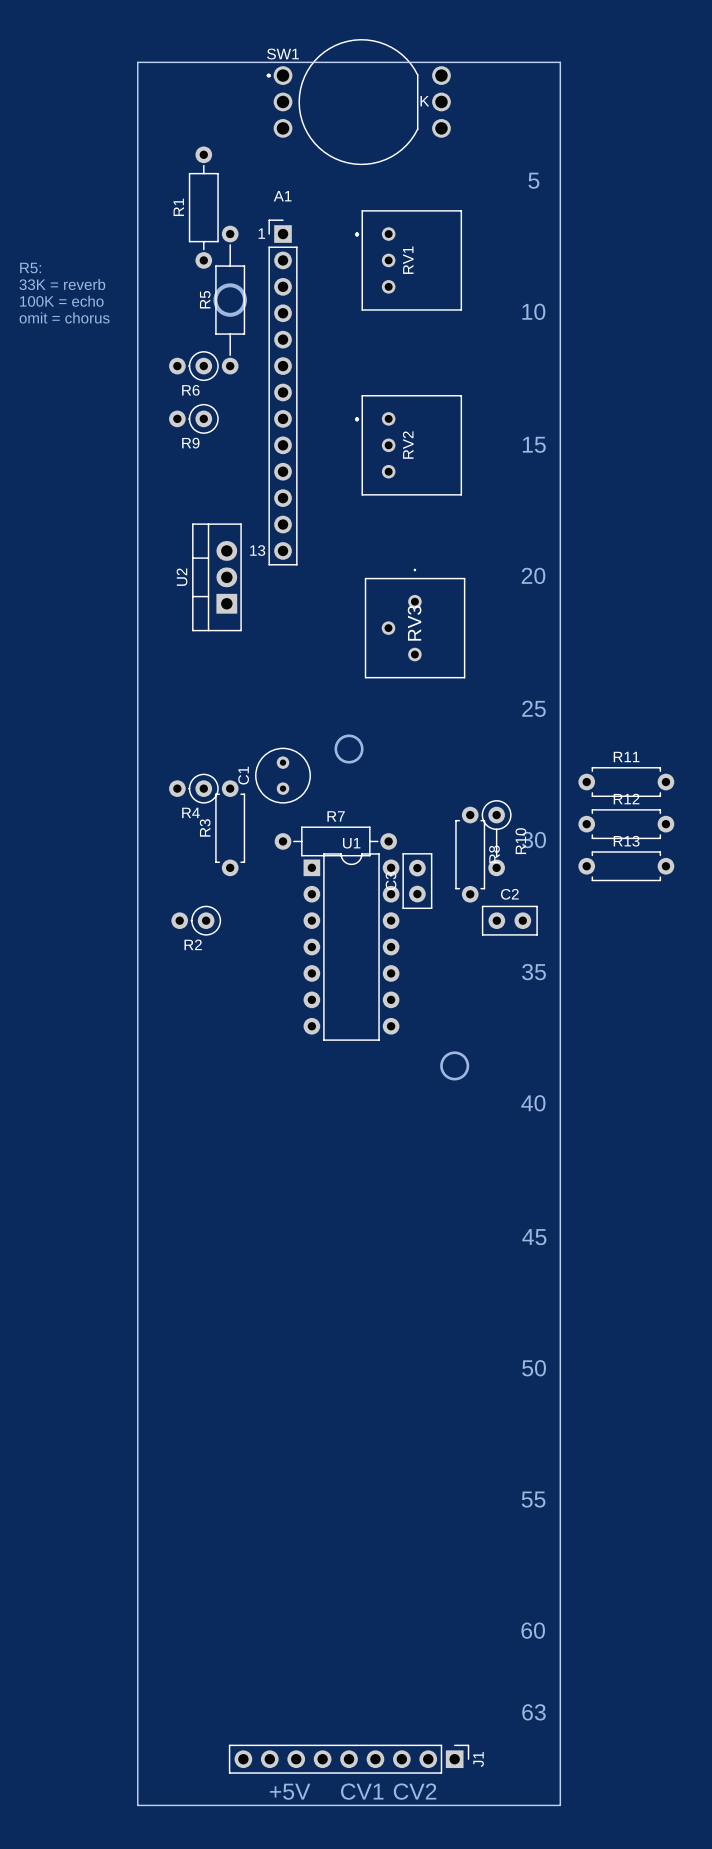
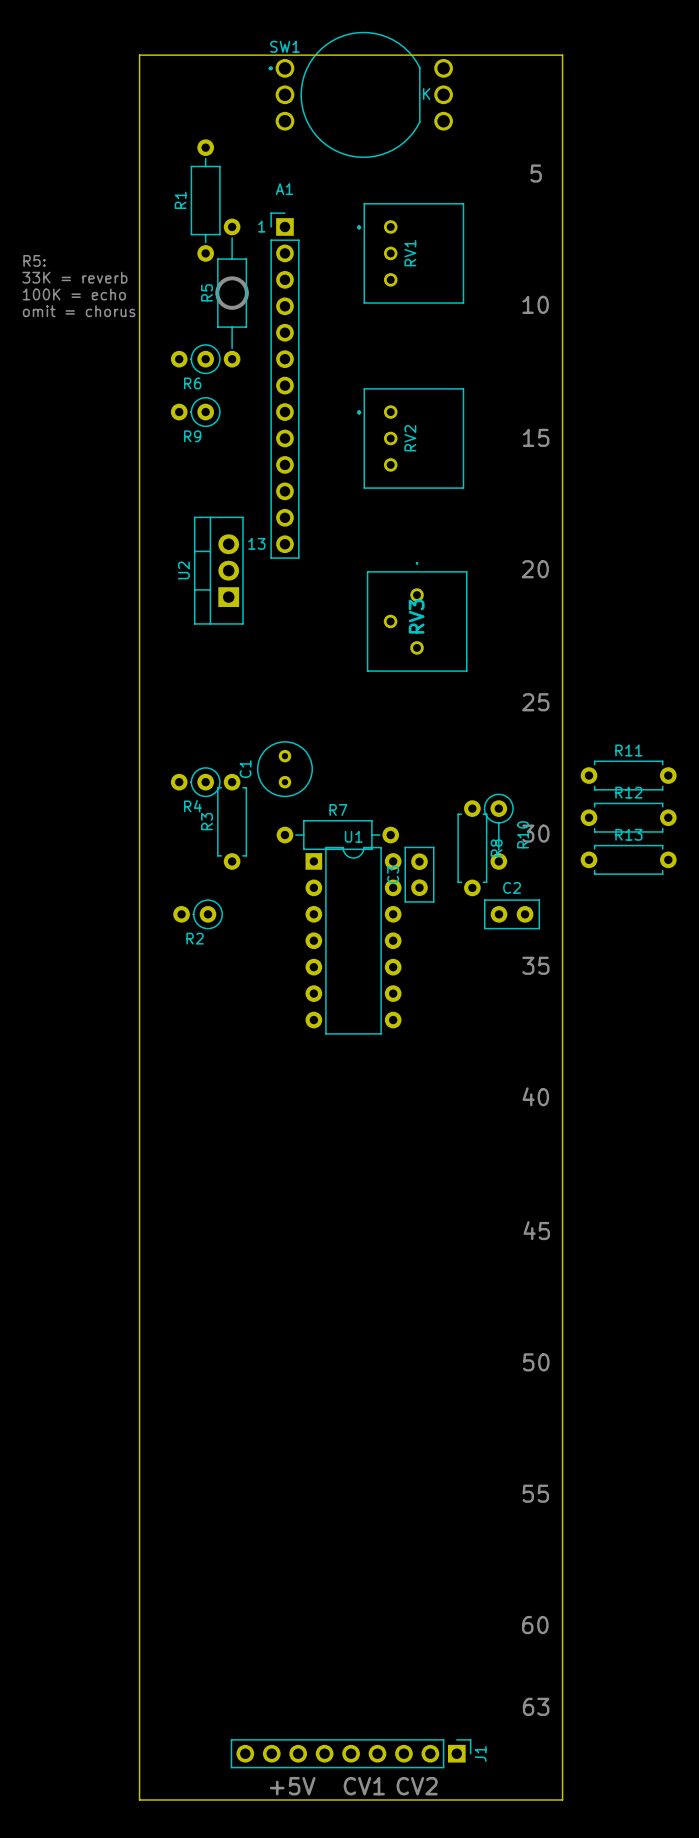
drawing: [334, 734, 364, 764] -> none
drawing: [440, 1051, 470, 1081] -> none

